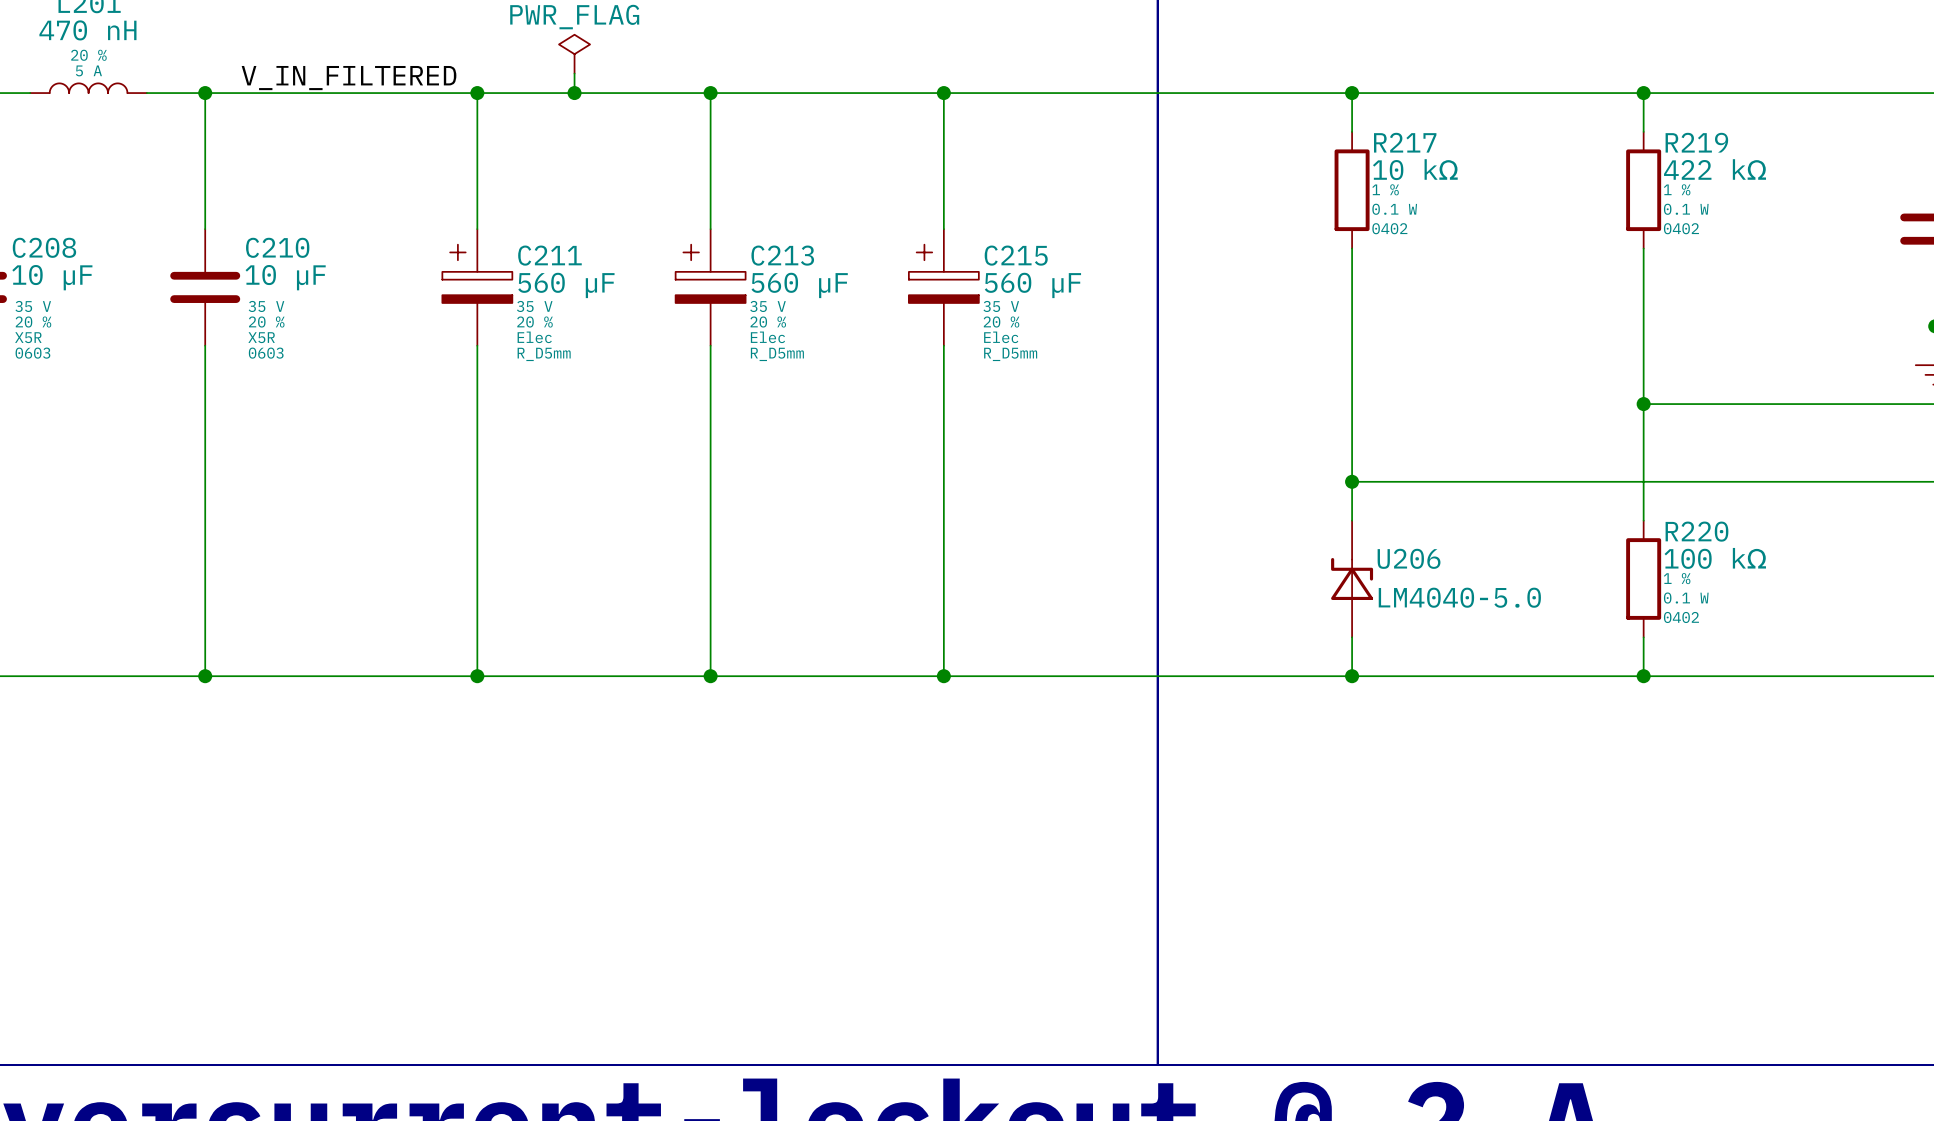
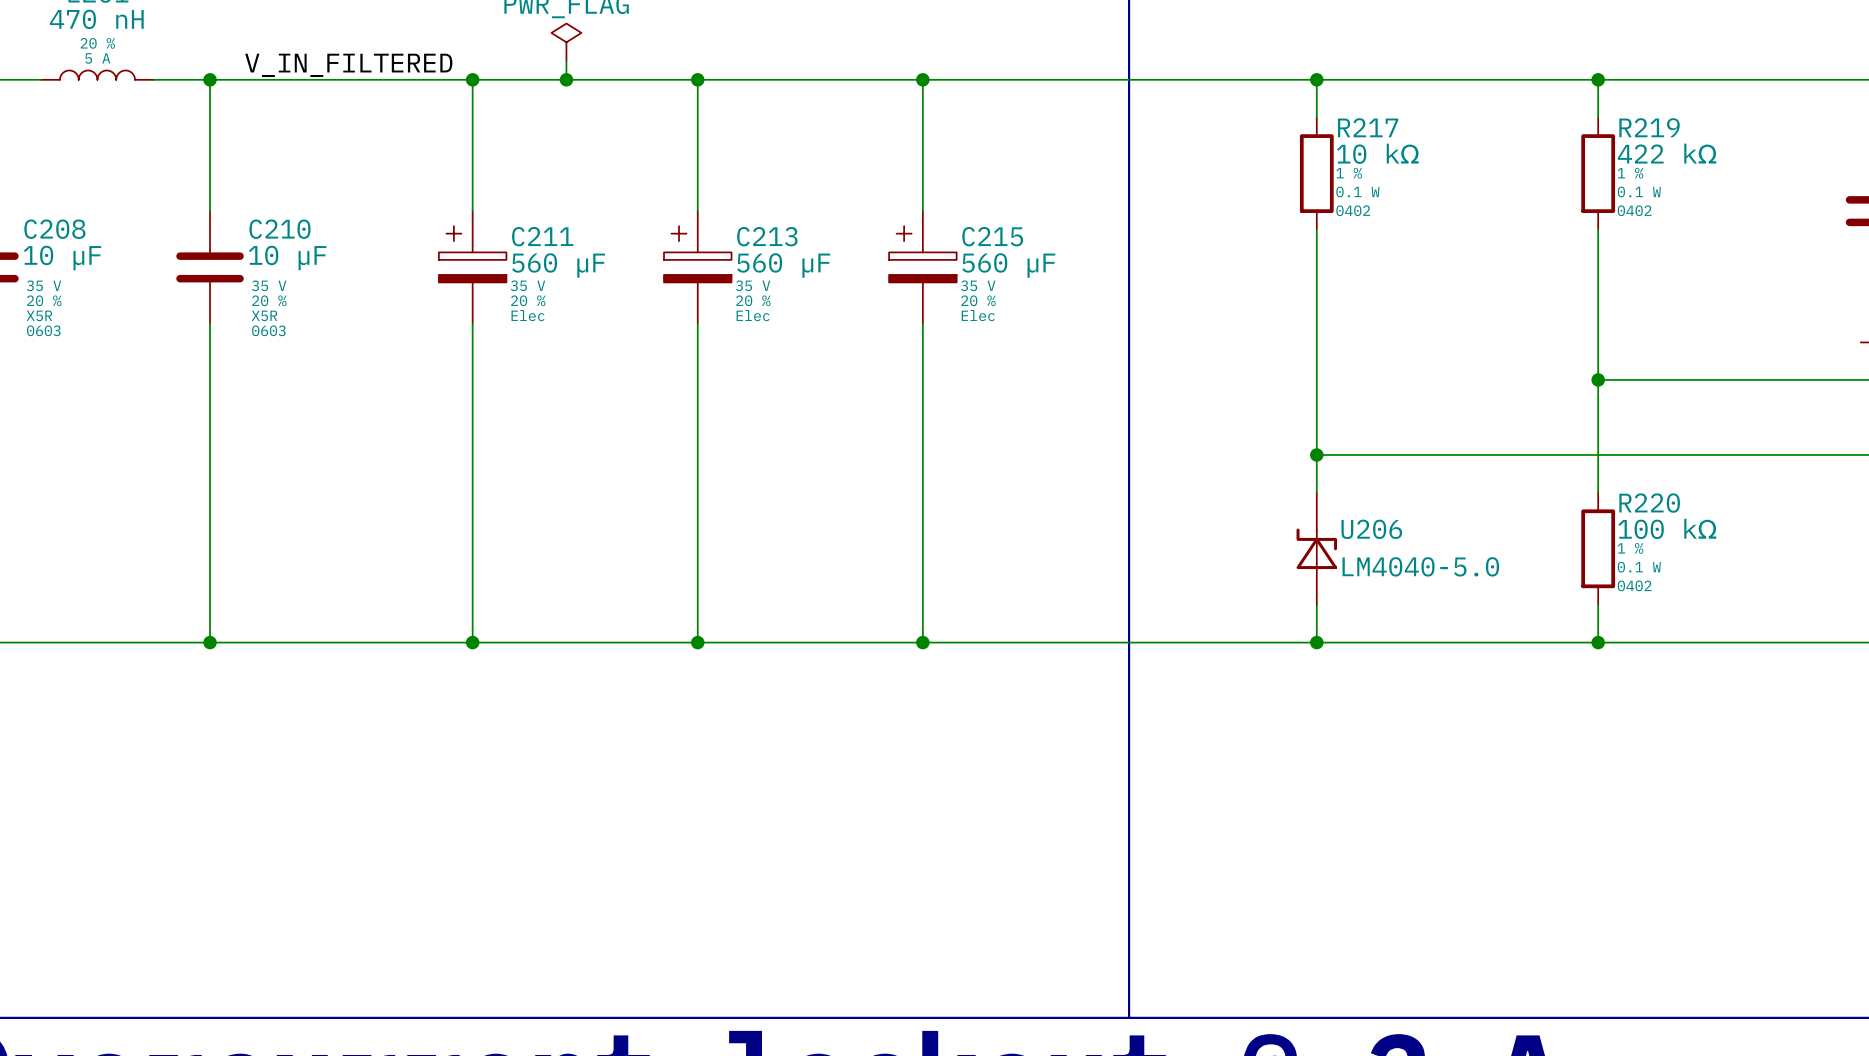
C211 text: R_D5mm (544, 354) -> none
C213 text: R_D5mm (777, 354) -> none
C215 text: R_D5mm (1010, 354) -> none

